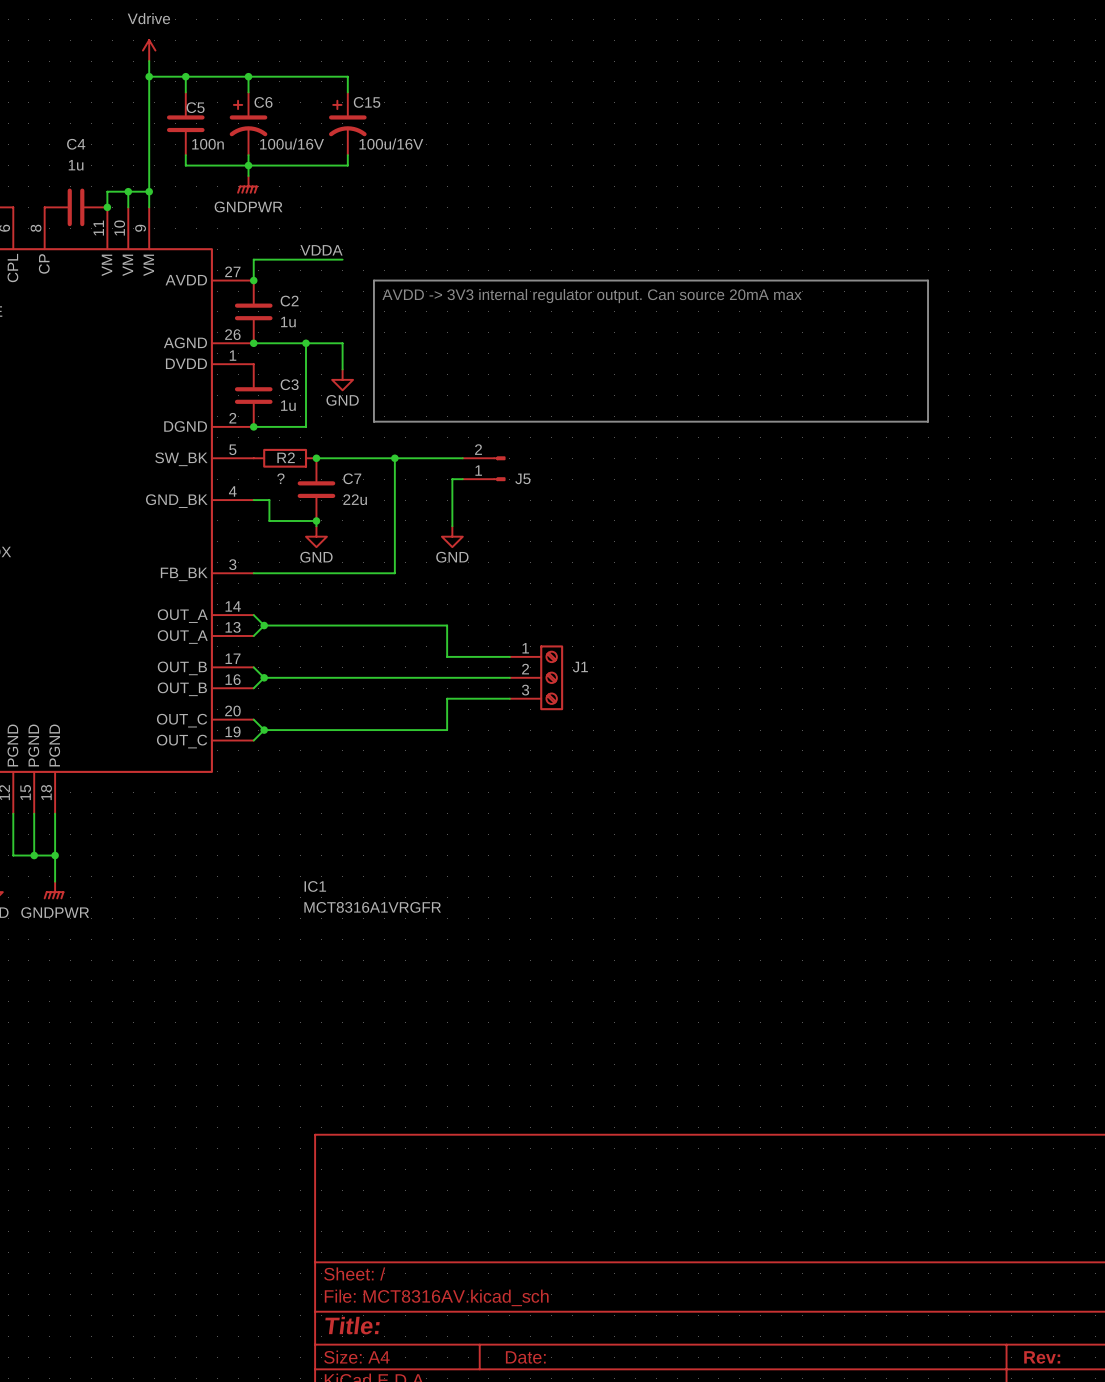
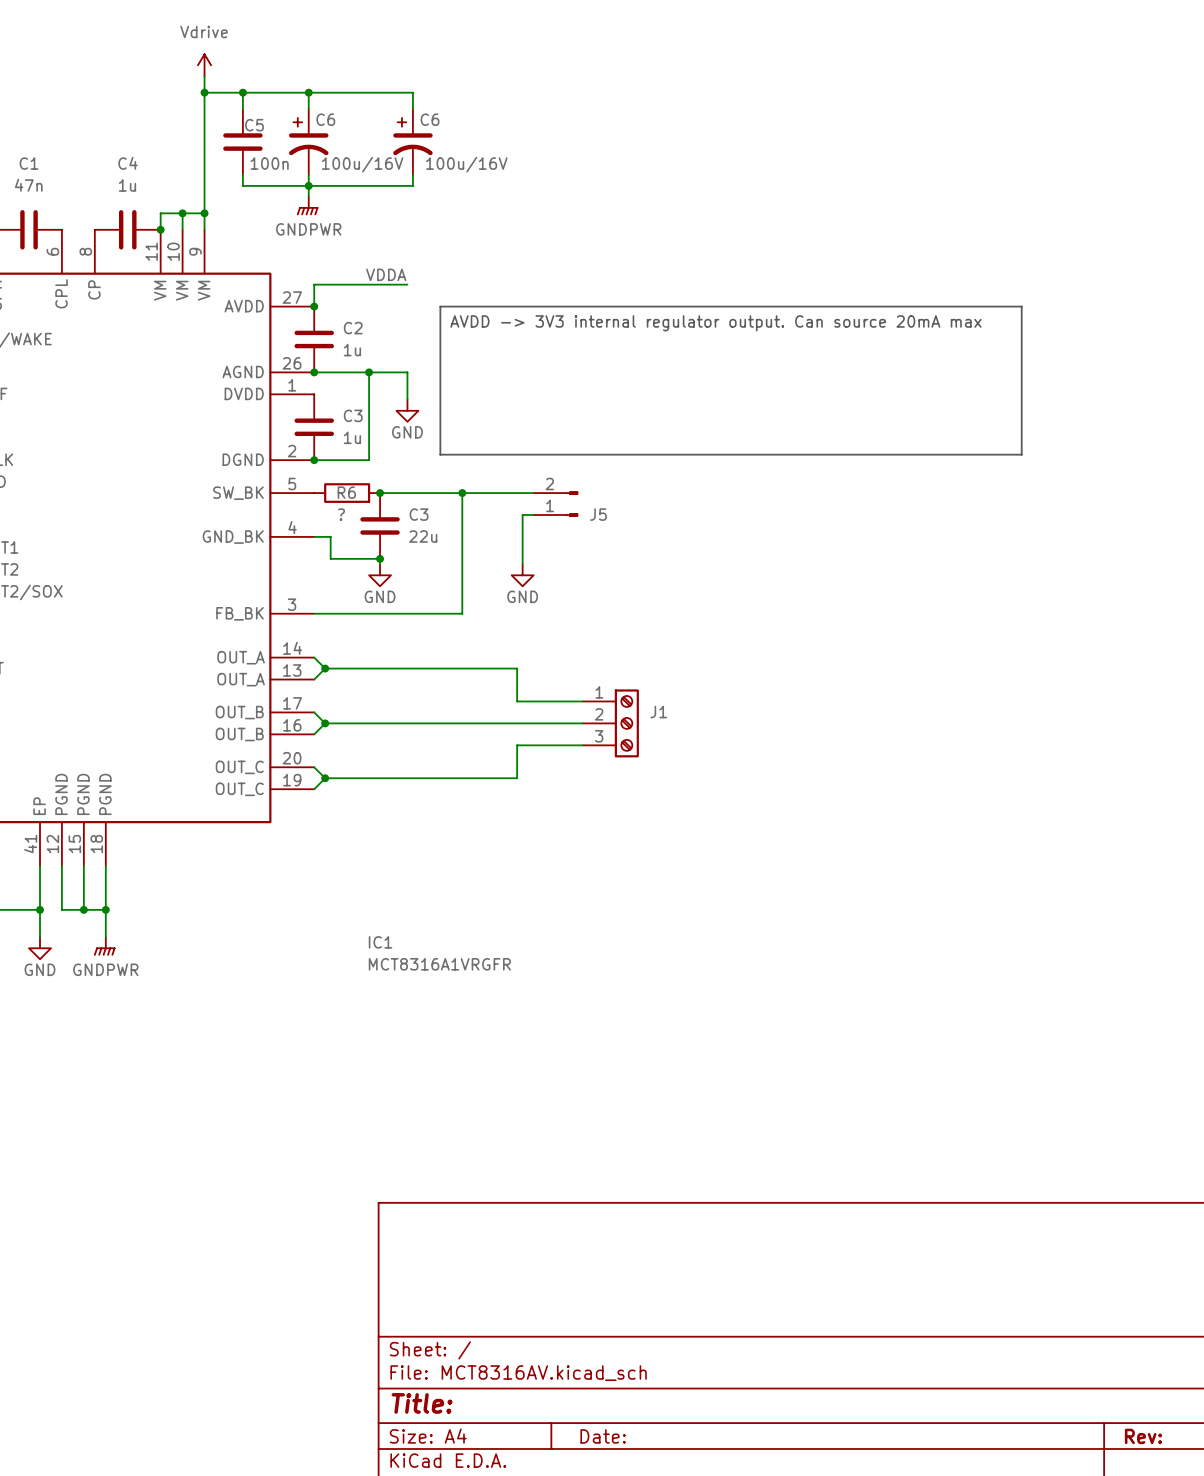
C15 name: C15 (367, 102) -> C6 (430, 119)
R2 name: R2 (286, 457) -> R6 (346, 492)
C7 name: C7 (352, 478) -> C3 (419, 514)

